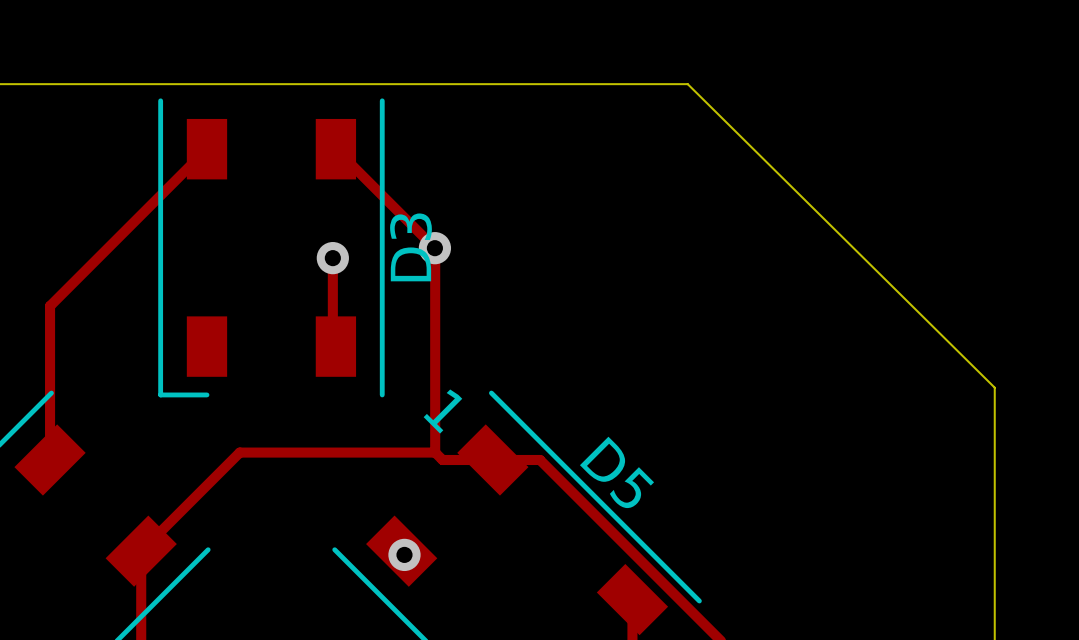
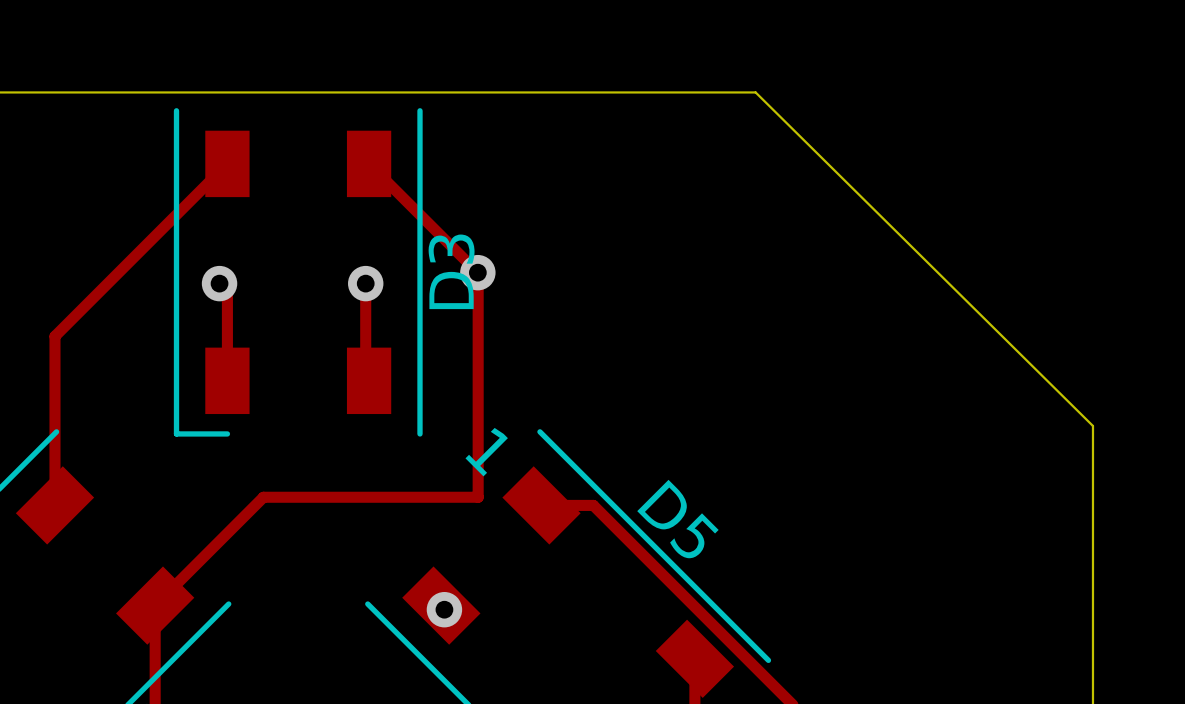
track: none -> (219, 283) (227, 291) (227, 380)
via: none -> (219, 283)
track: (435, 452) (442, 459) (492, 459) -> none

